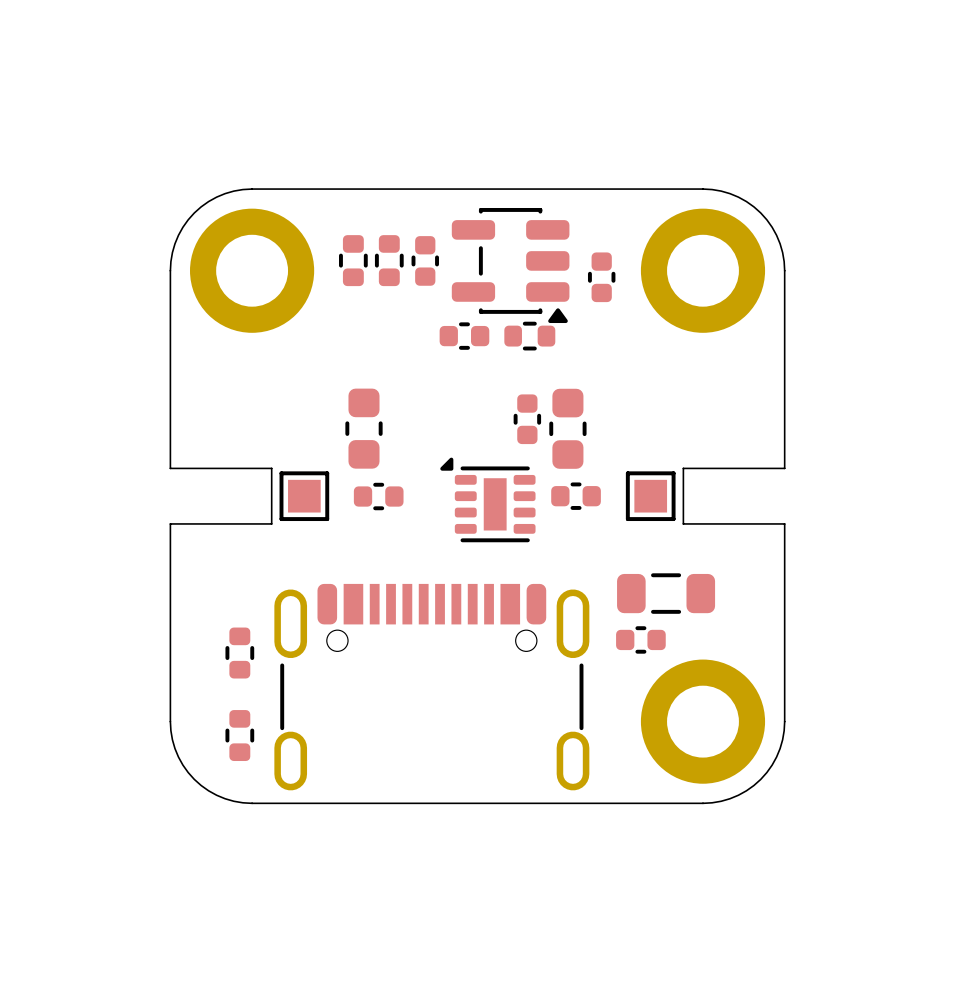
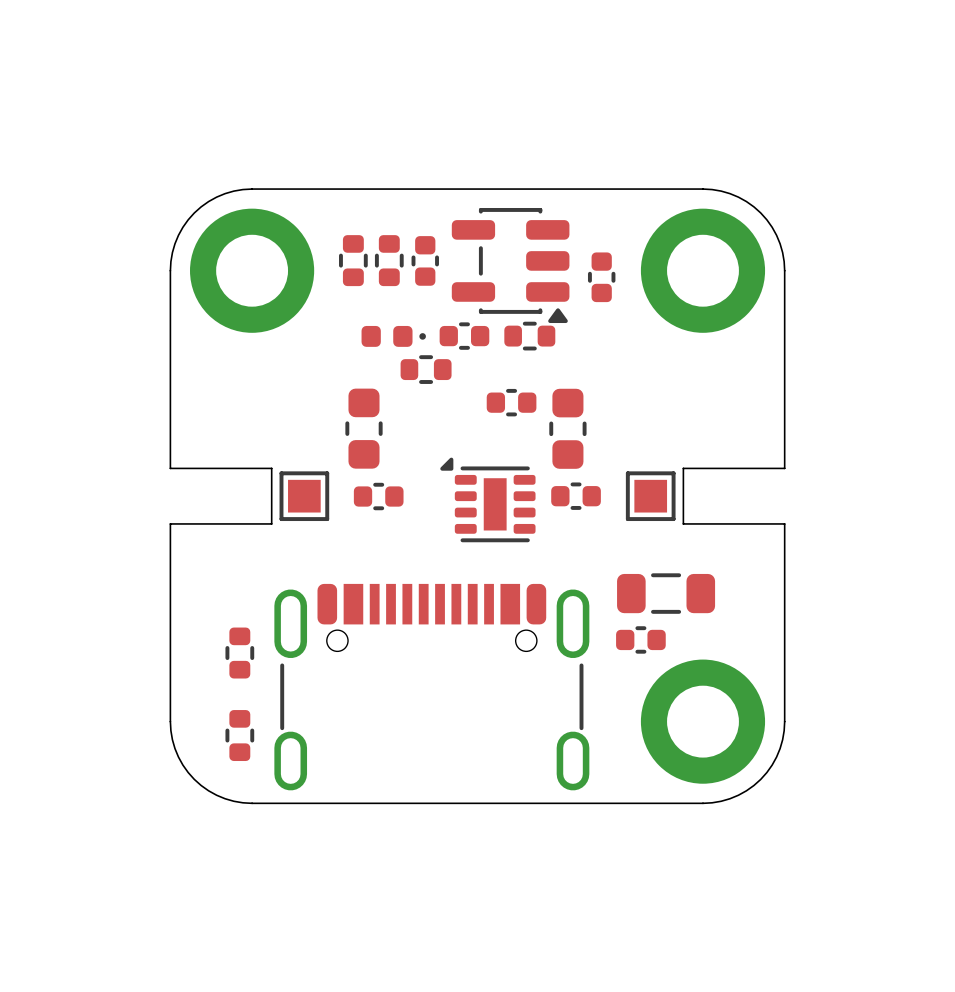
part: none -> (393, 336)
part: none -> (426, 369)
part rotation: 0° (527, 419) -> 90° clockwise (511, 402)

